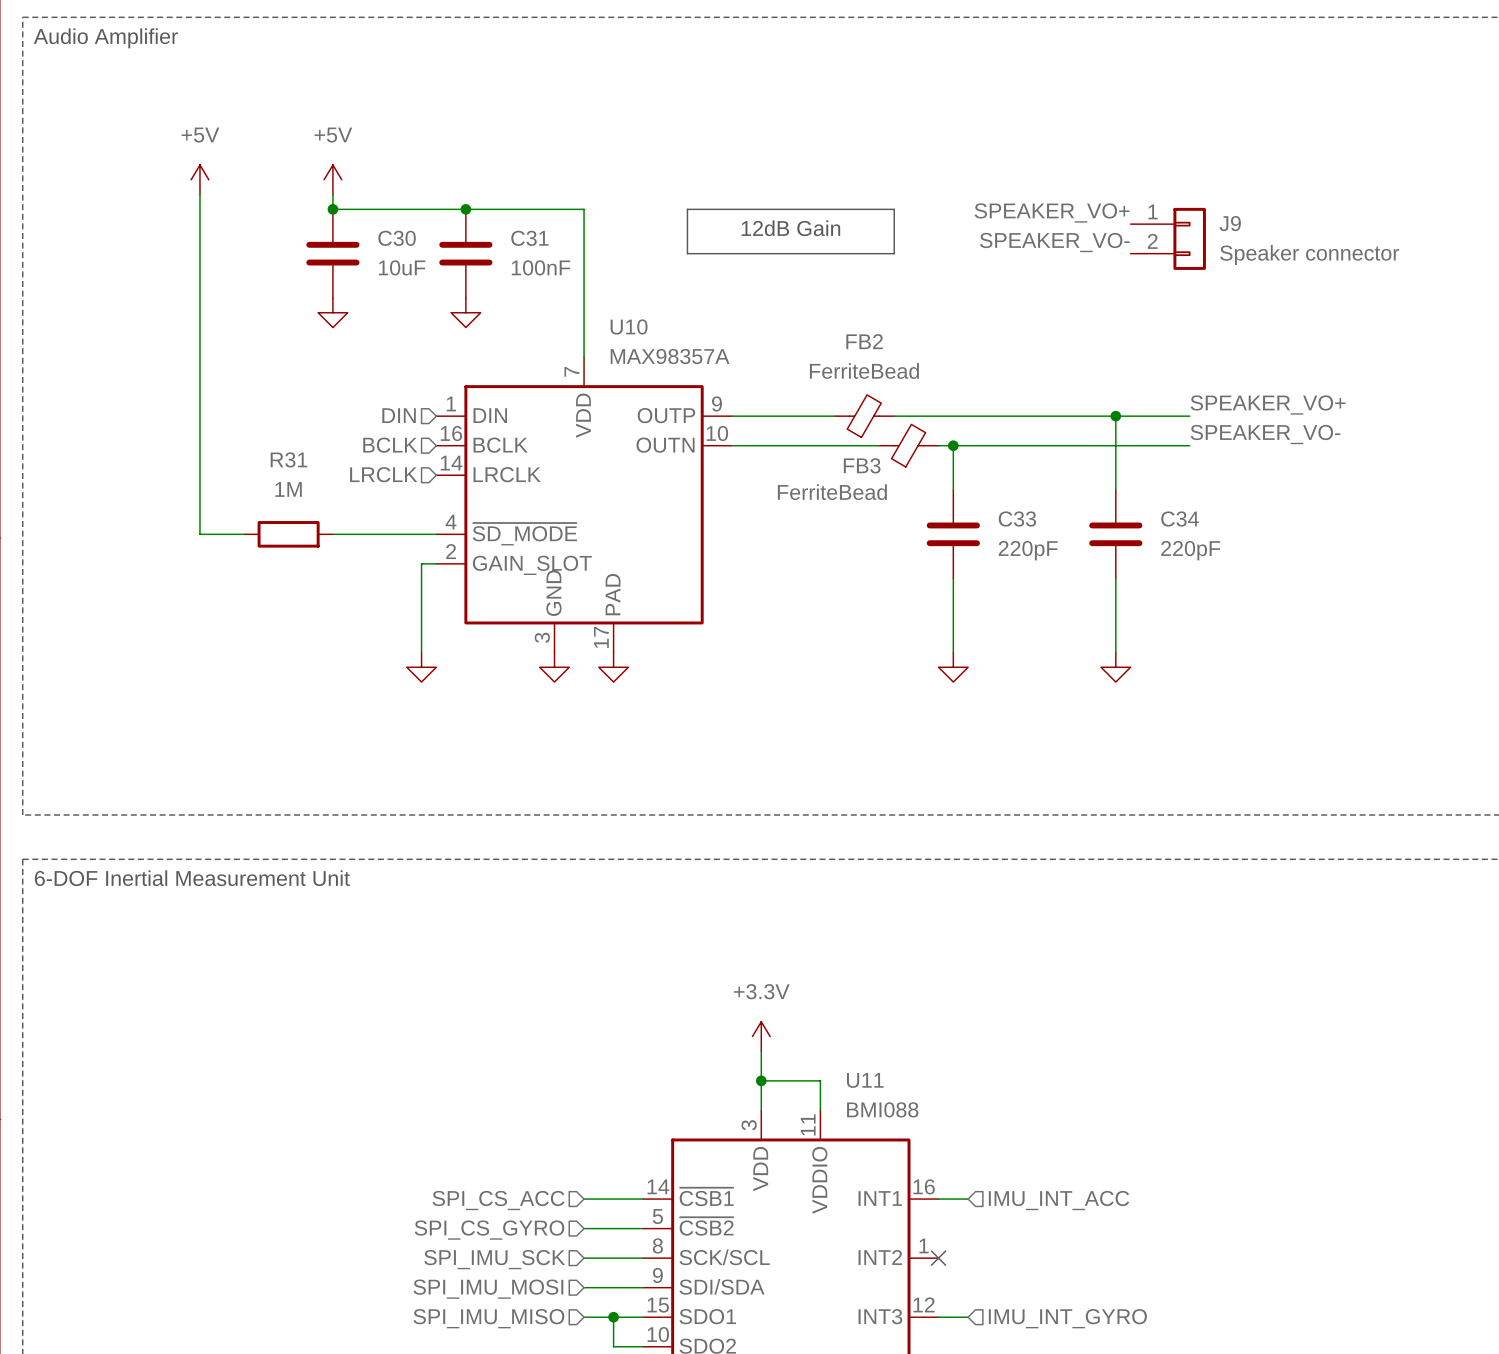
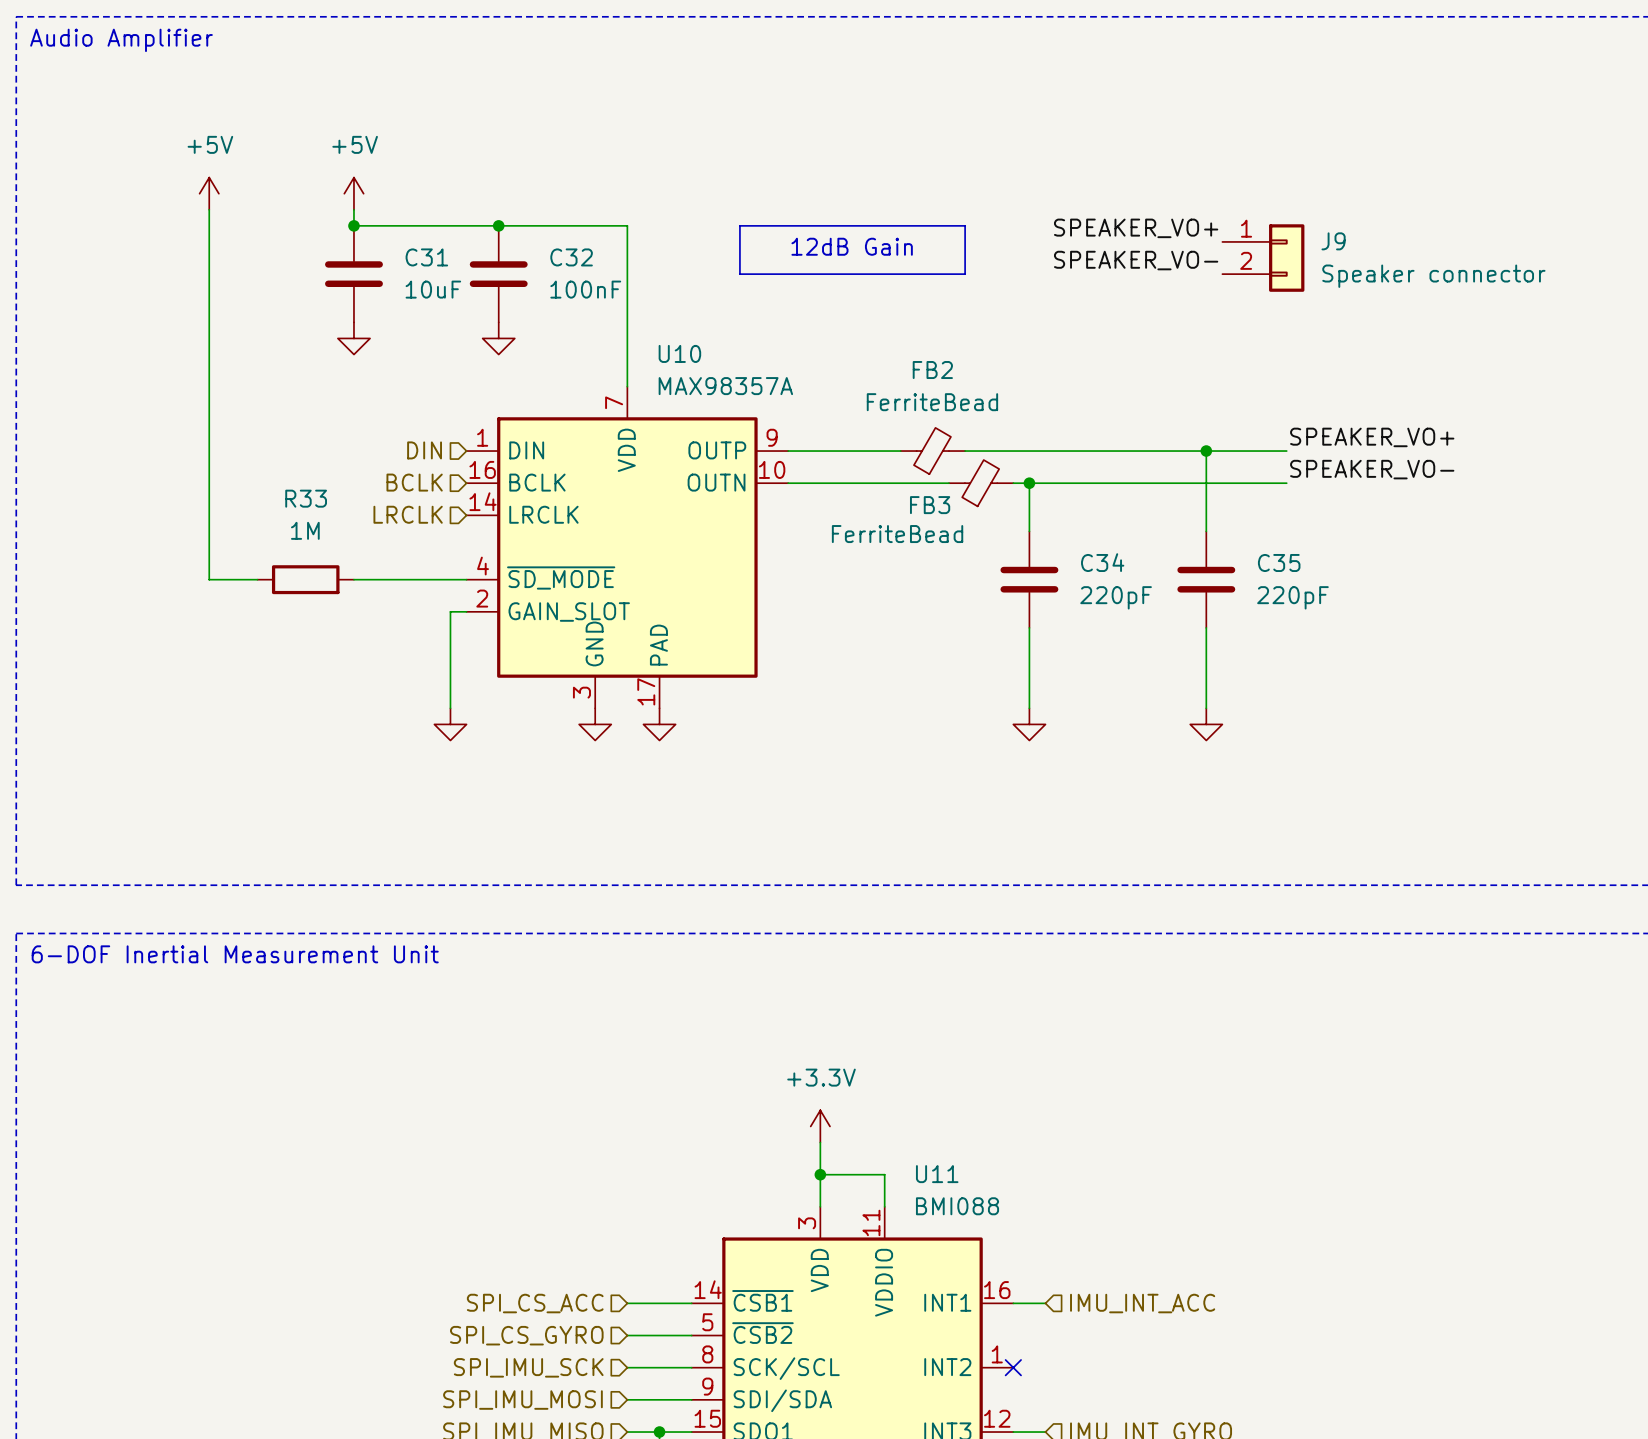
C30 name: C30 (397, 238) -> C31 (426, 257)
C31 name: C31 (529, 238) -> C32 (571, 257)
R31 name: R31 (288, 459) -> R33 (306, 498)
C33 name: C33 (1017, 519) -> C34 (1102, 562)
C34 name: C34 (1180, 519) -> C35 (1279, 562)

